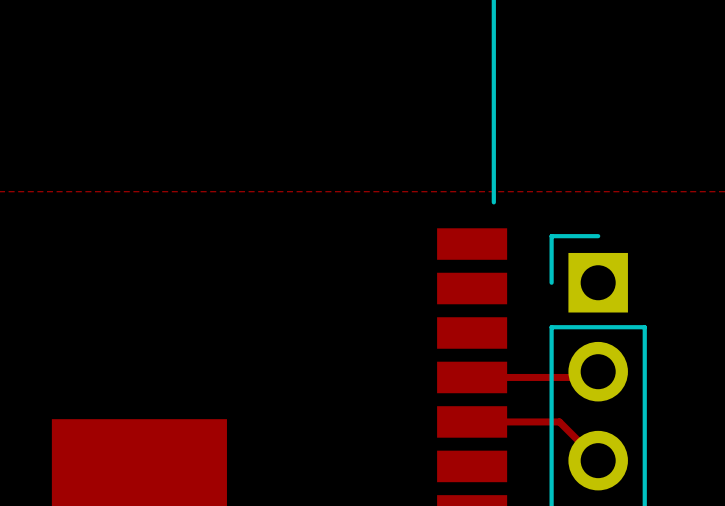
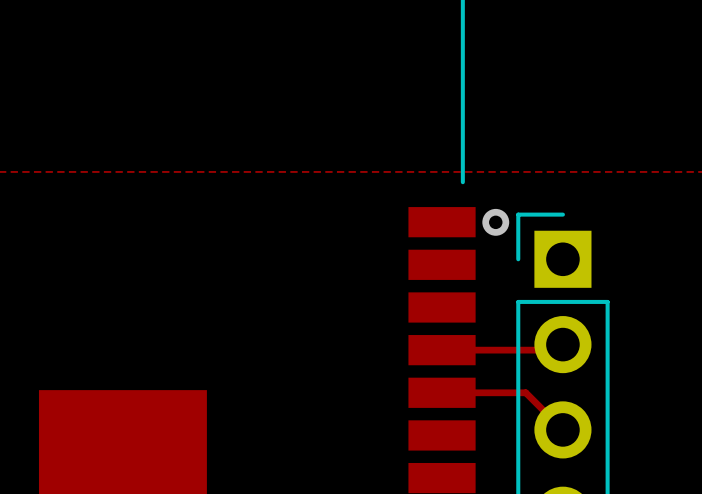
via: none -> (495, 222)

